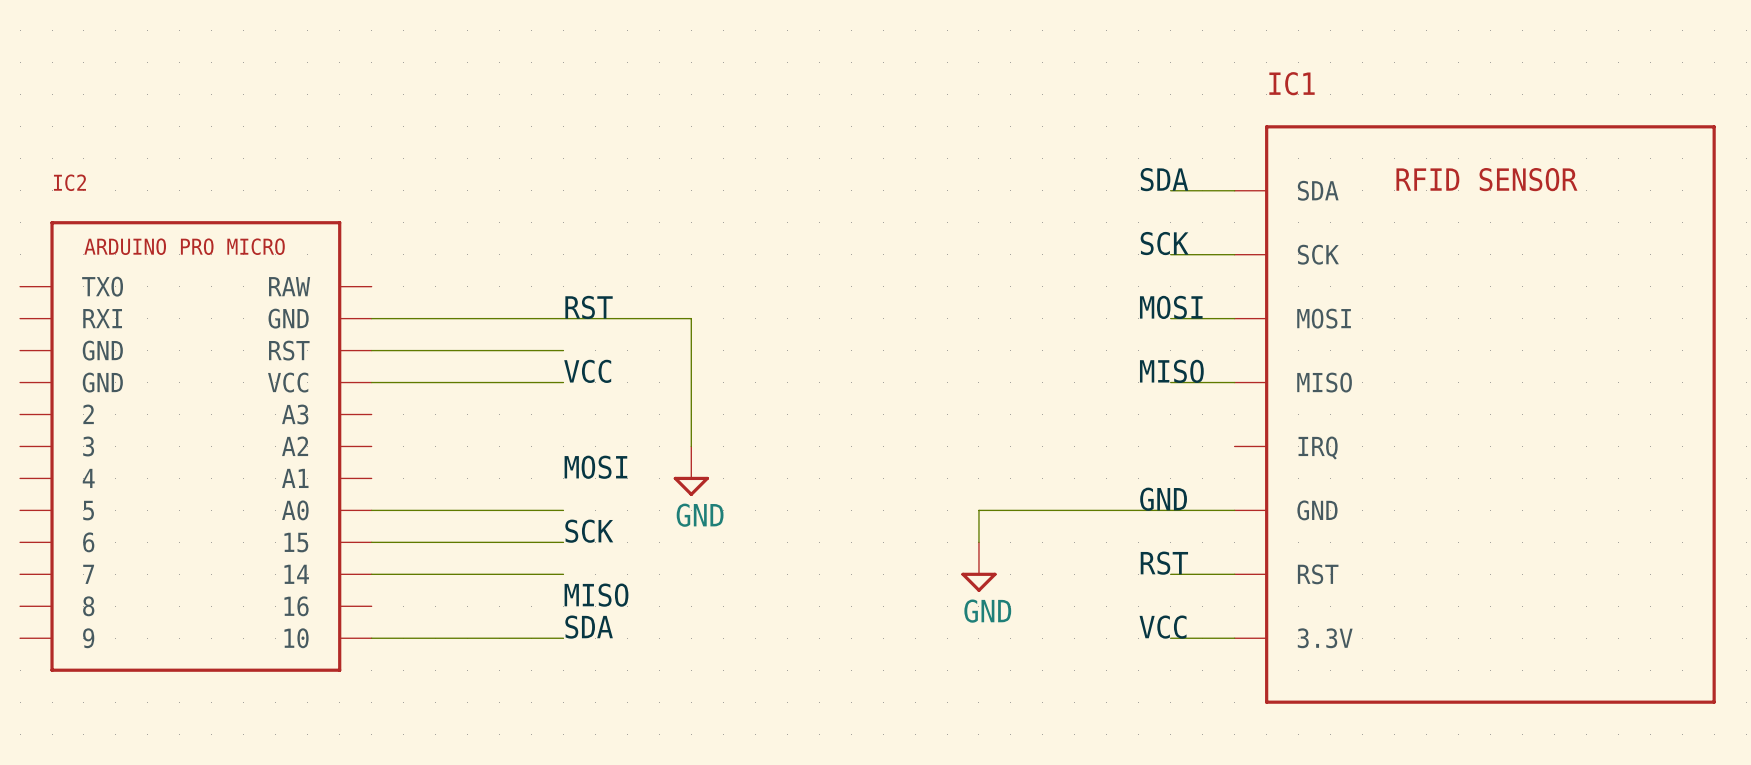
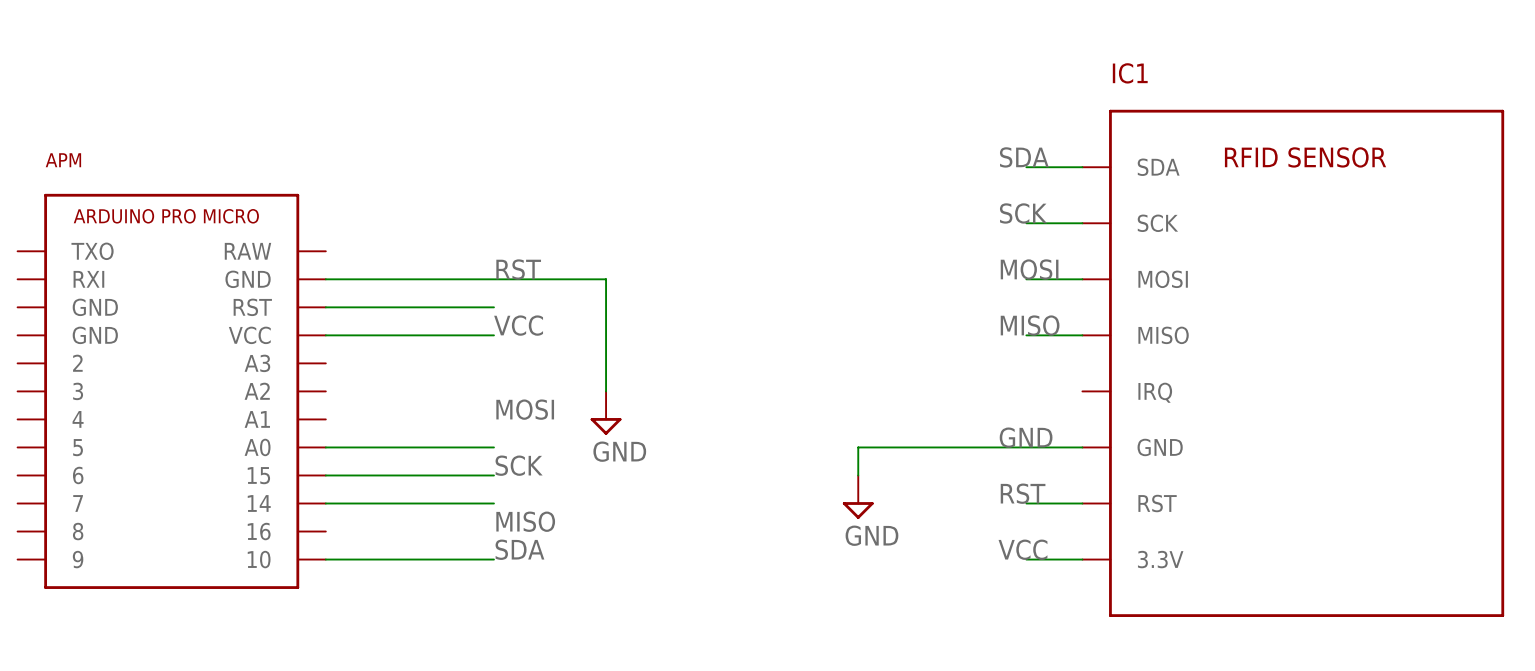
IC2 name: IC2 (69, 182) -> APM (63, 160)

